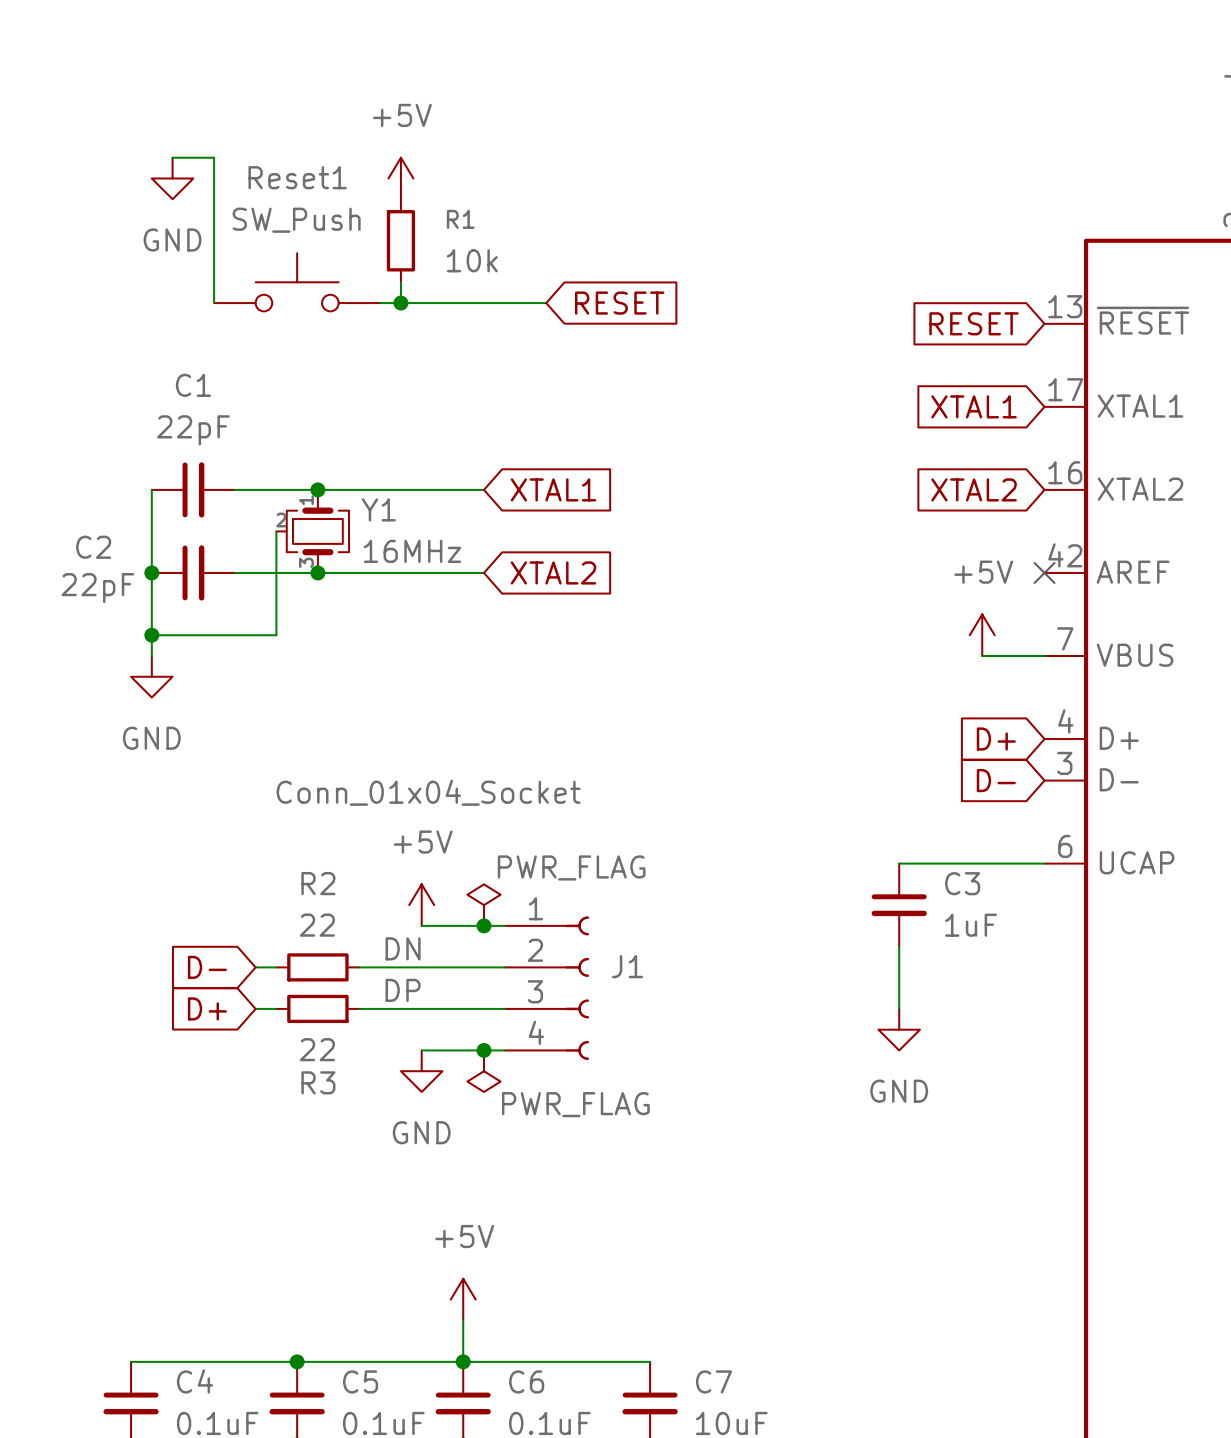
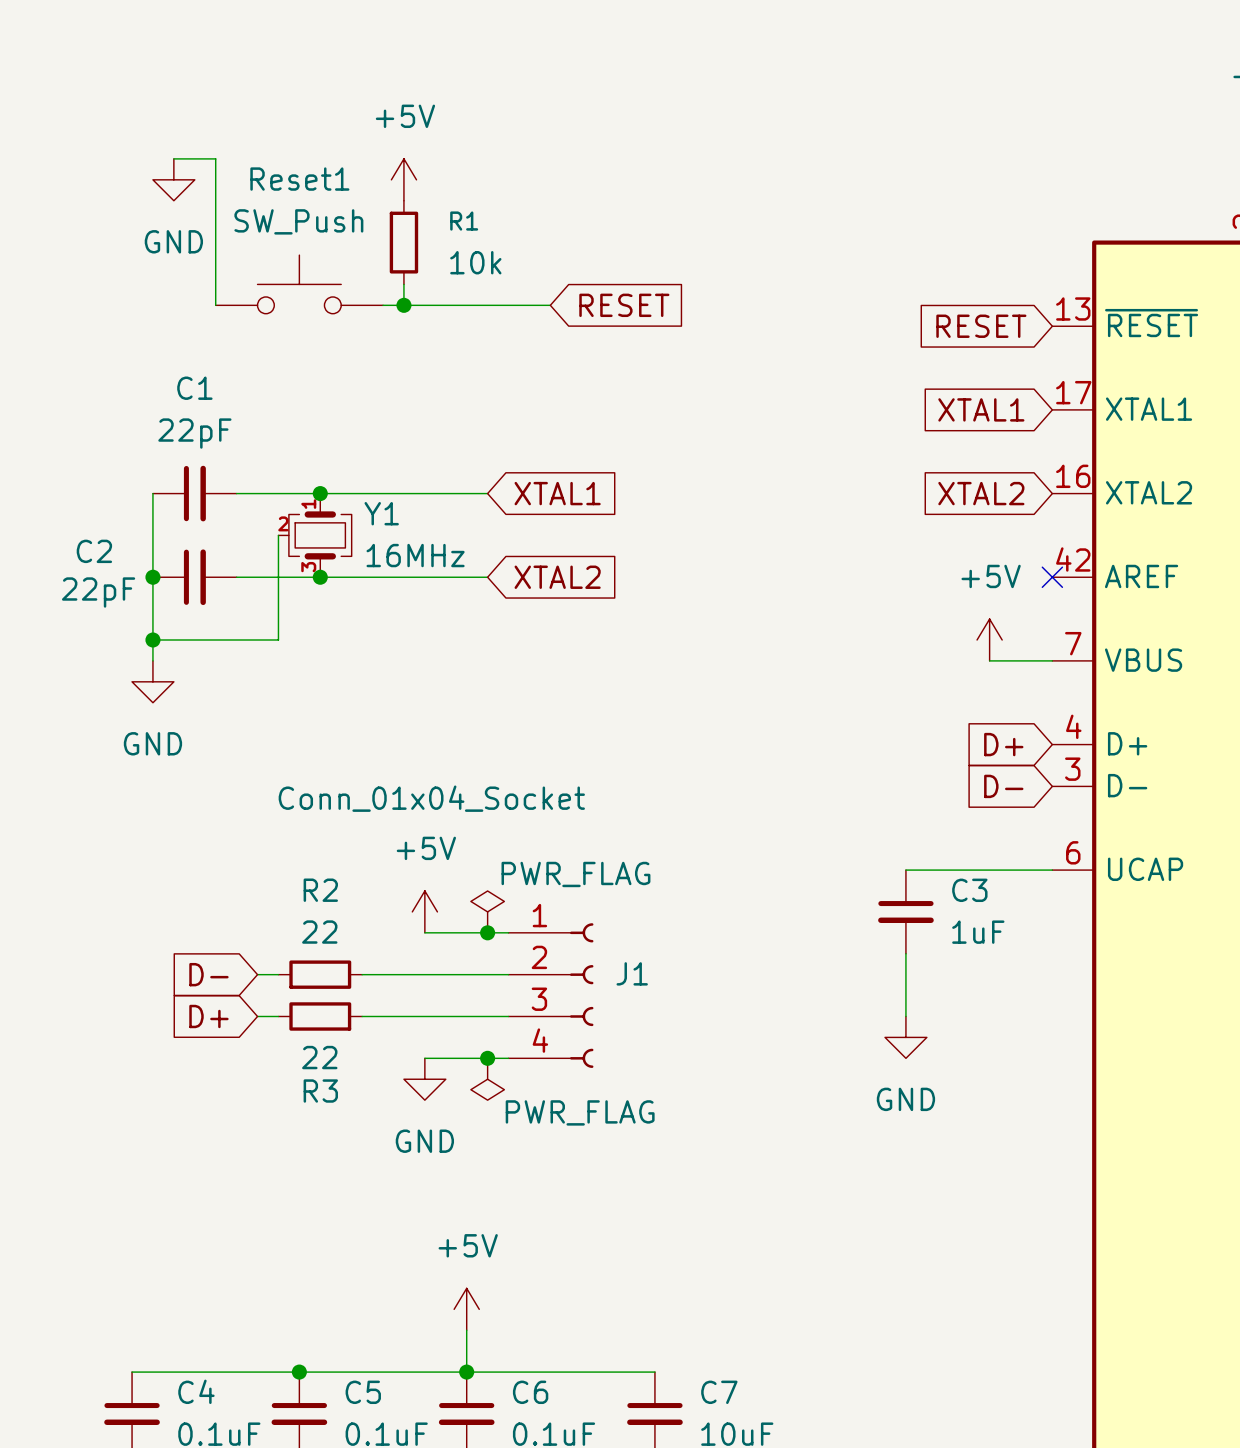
label: DN (403, 948) -> none
label: DP (403, 990) -> none

